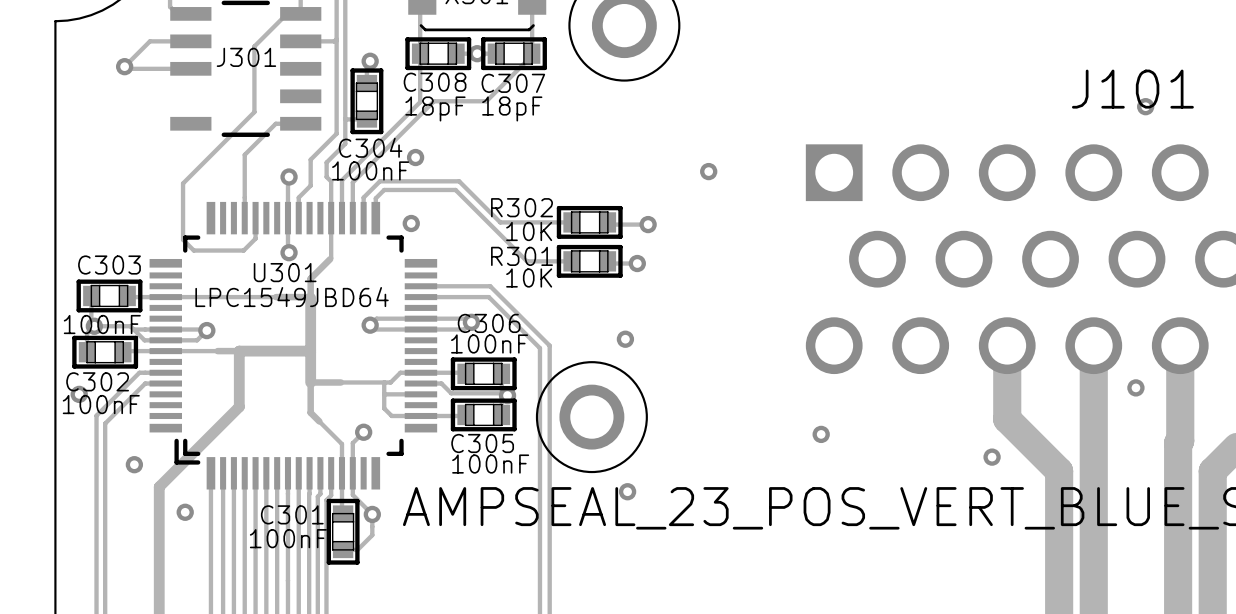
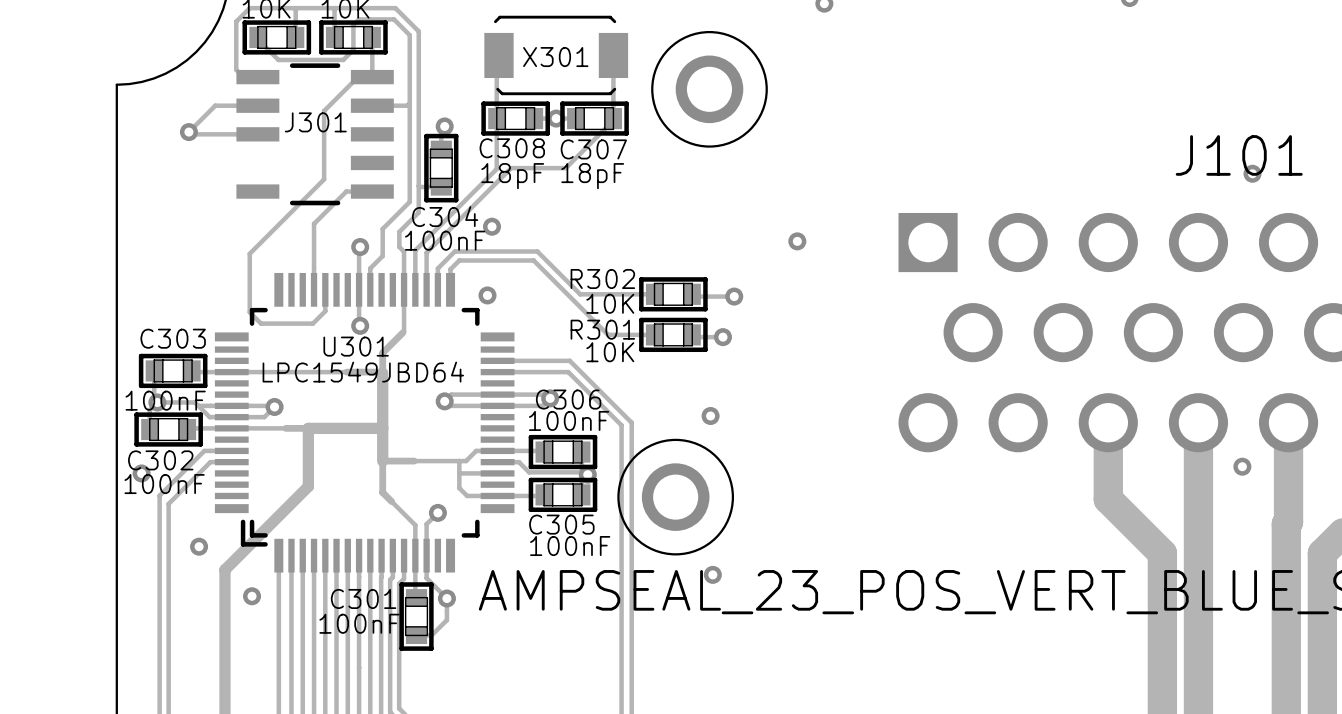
via: (821, 434) -> none
via: (992, 457) -> none

